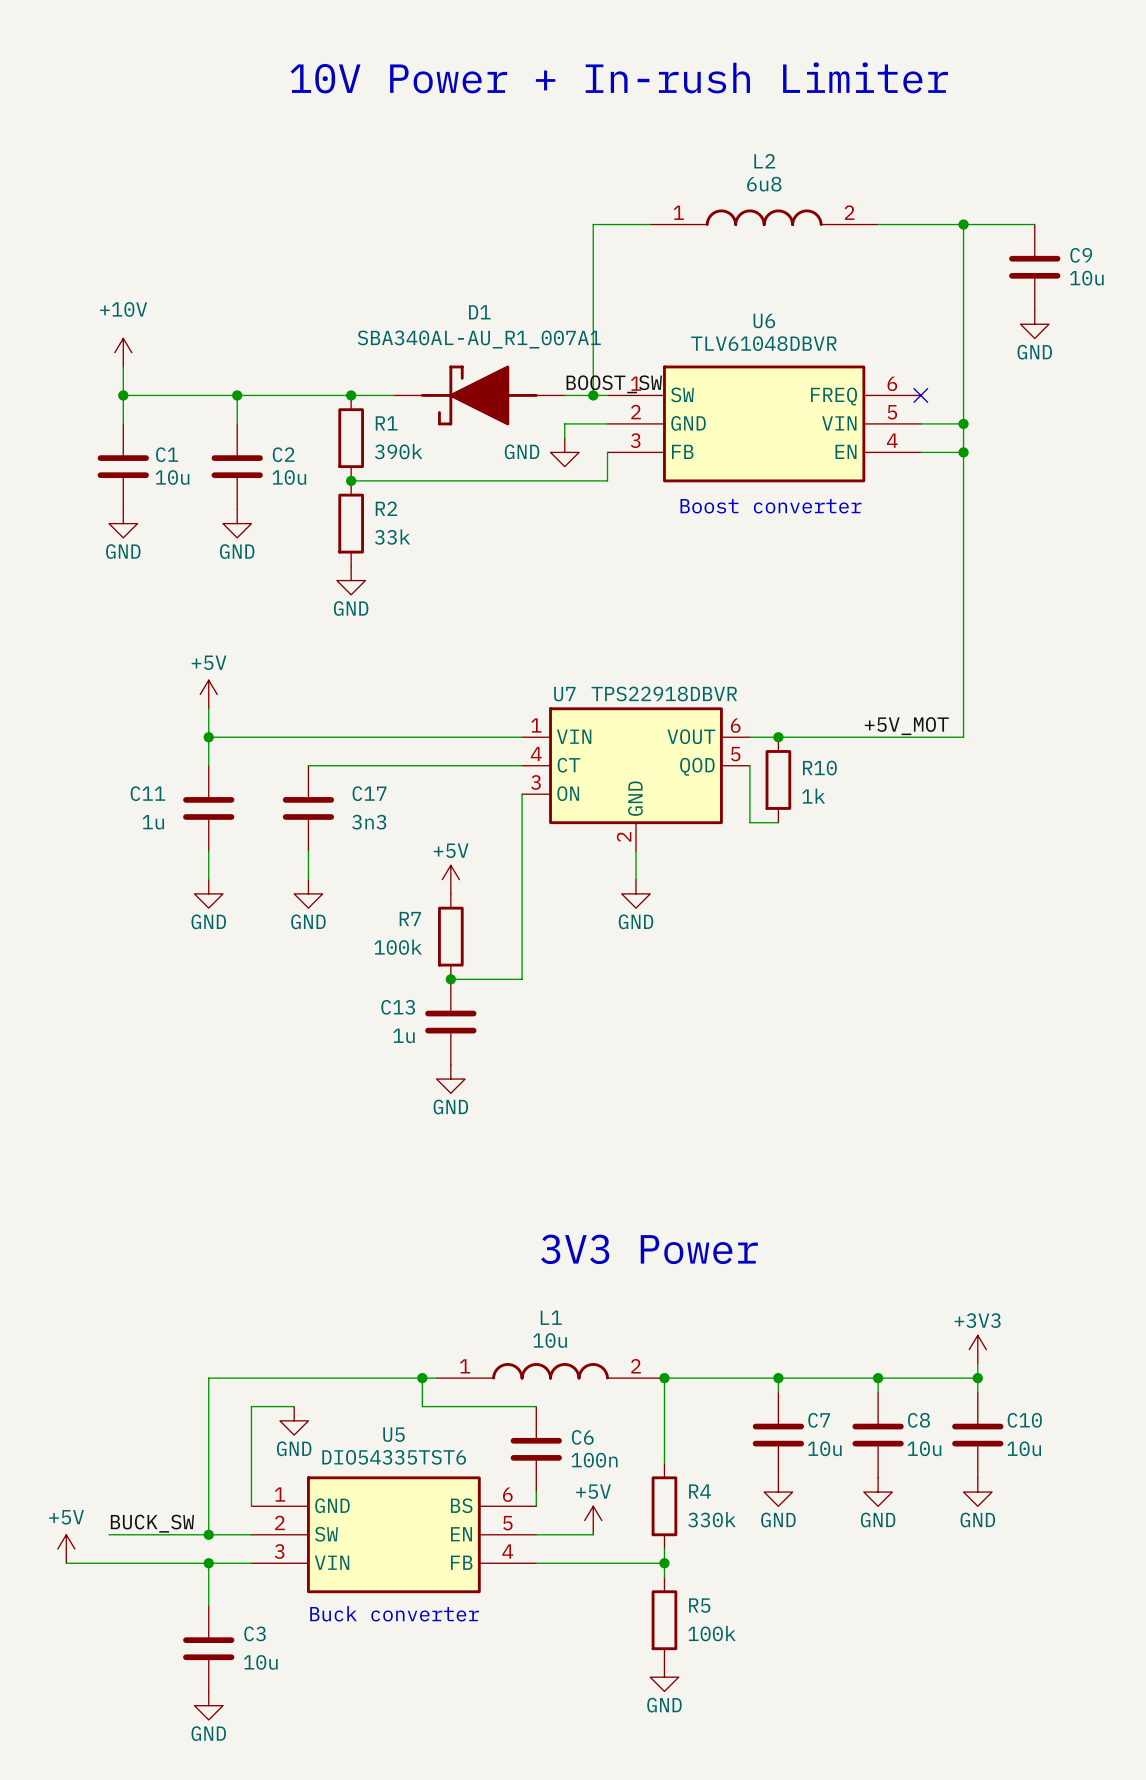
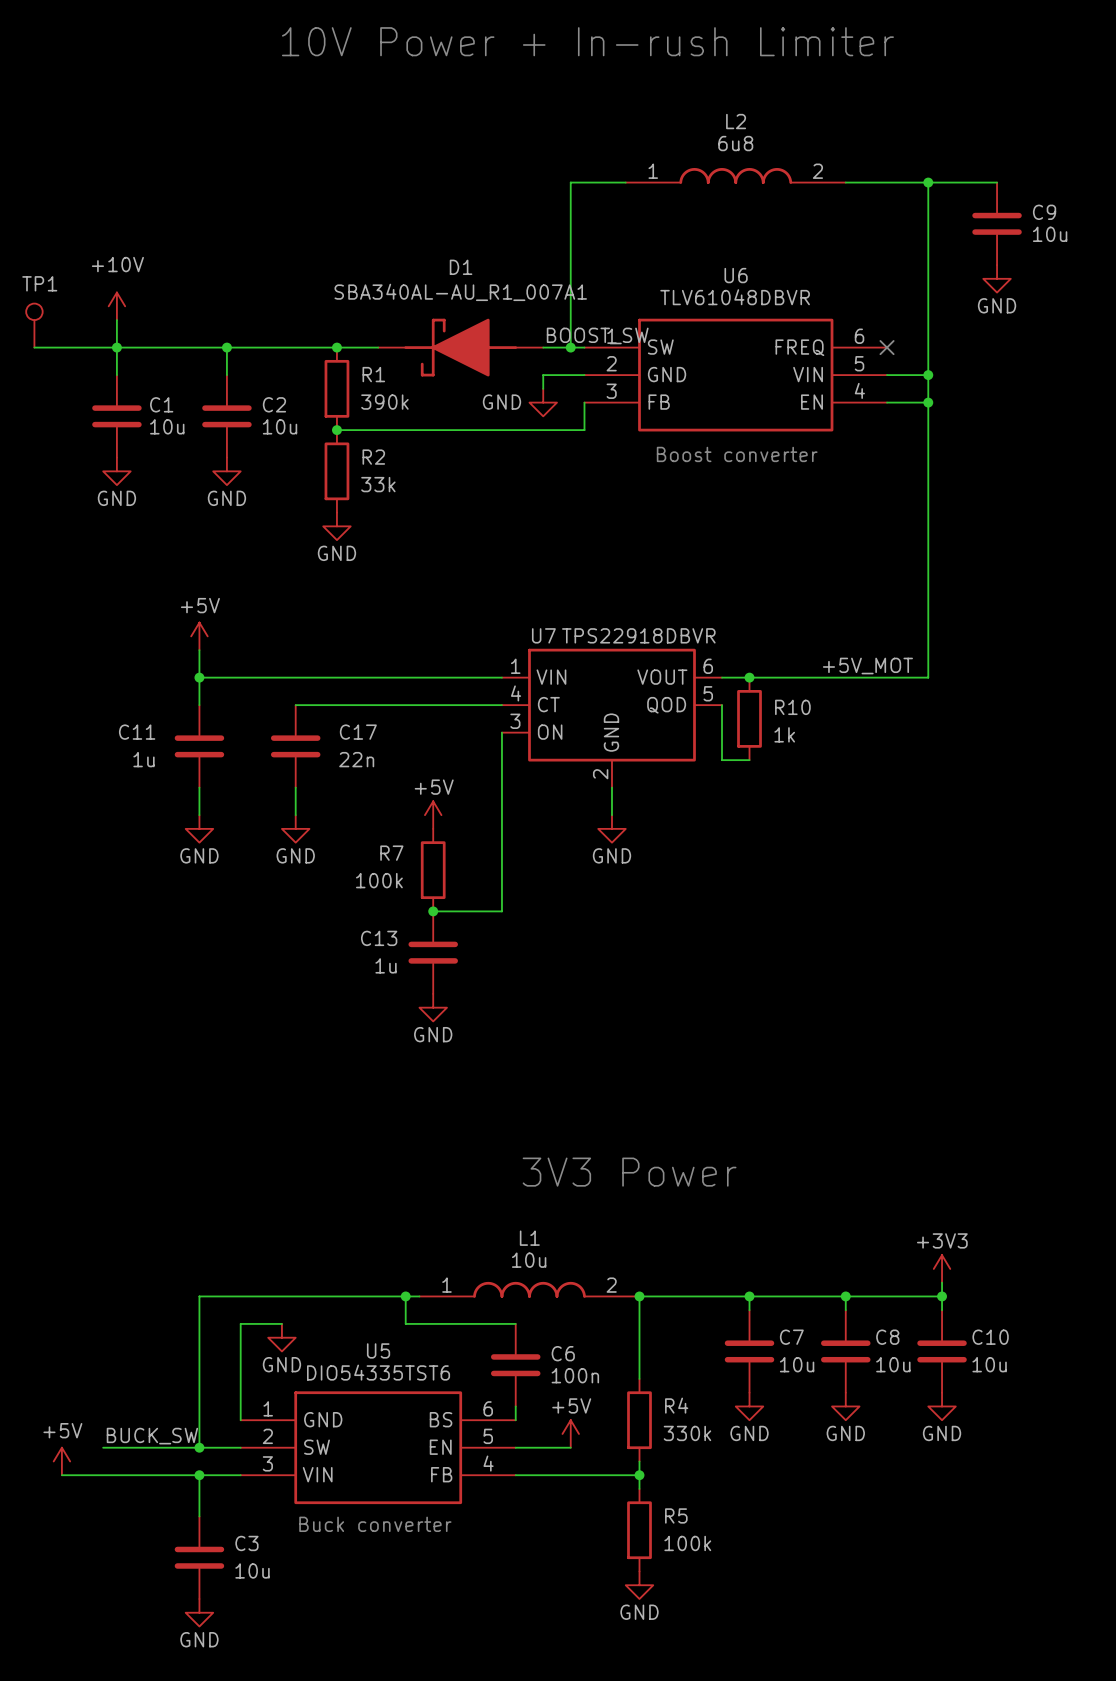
TP1: none -> (34, 325)
wire: none -> (34, 347) (116, 347)
C17 value: 3n3 (369, 822) -> 22n (356, 759)

